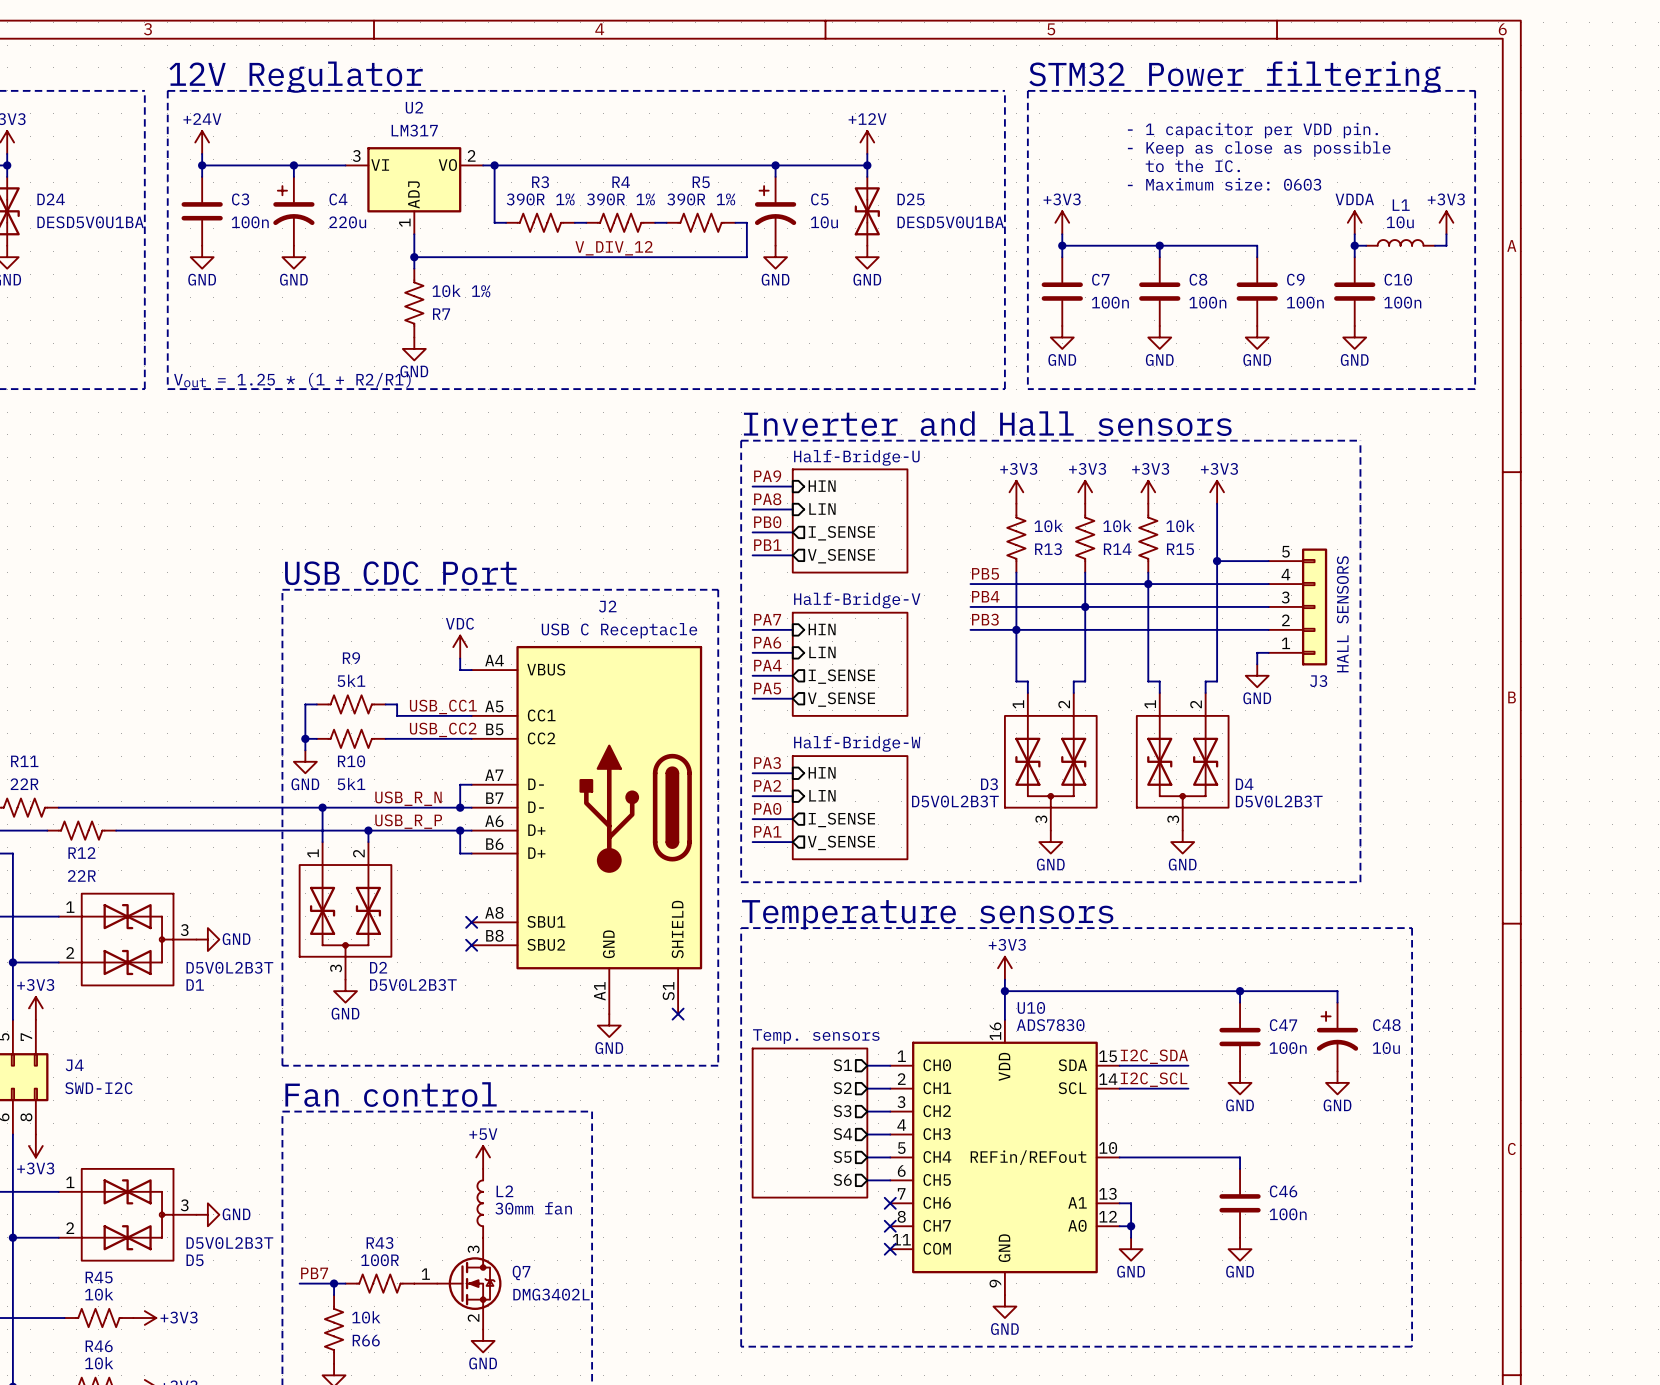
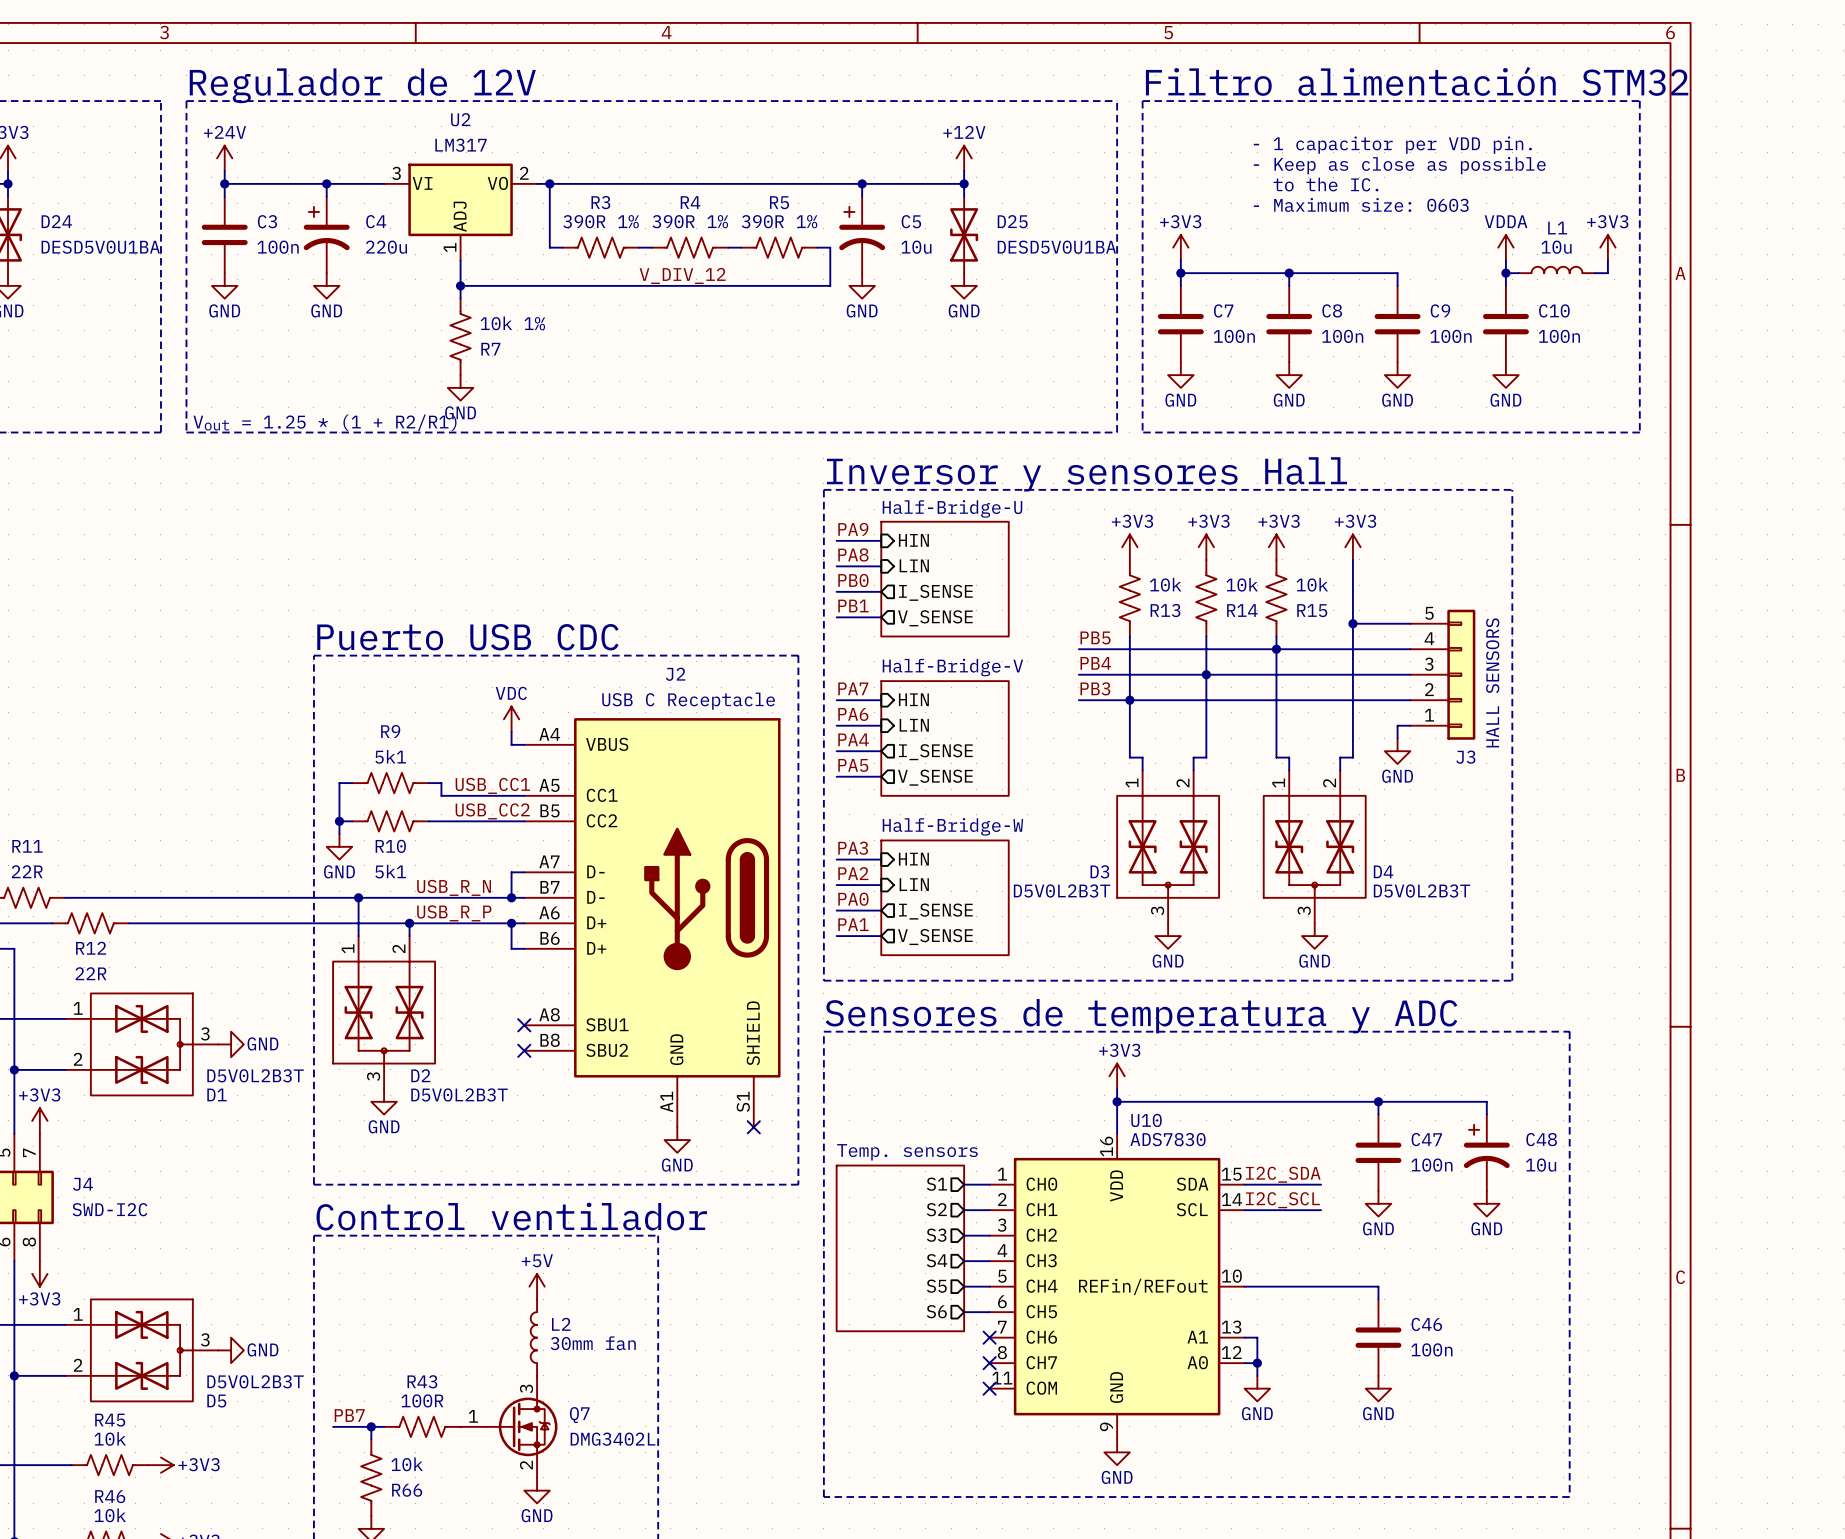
text: 12V Regulator (296, 77) -> Regulador de 12V (362, 85)
text: STM32 Power filtering (1235, 77) -> Filtro alimentación STM32 (1417, 81)
text: Inverter and Hall sensors (987, 423) -> Inversor y sensores Hall (1086, 474)
text: USB CDC Port (400, 573) -> Puerto USB CDC (467, 637)
text: Temperature sensors (927, 914) -> Sensores de temperatura y ADC (1141, 1016)
text: Fan control (391, 1094) -> Control ventilador (511, 1216)

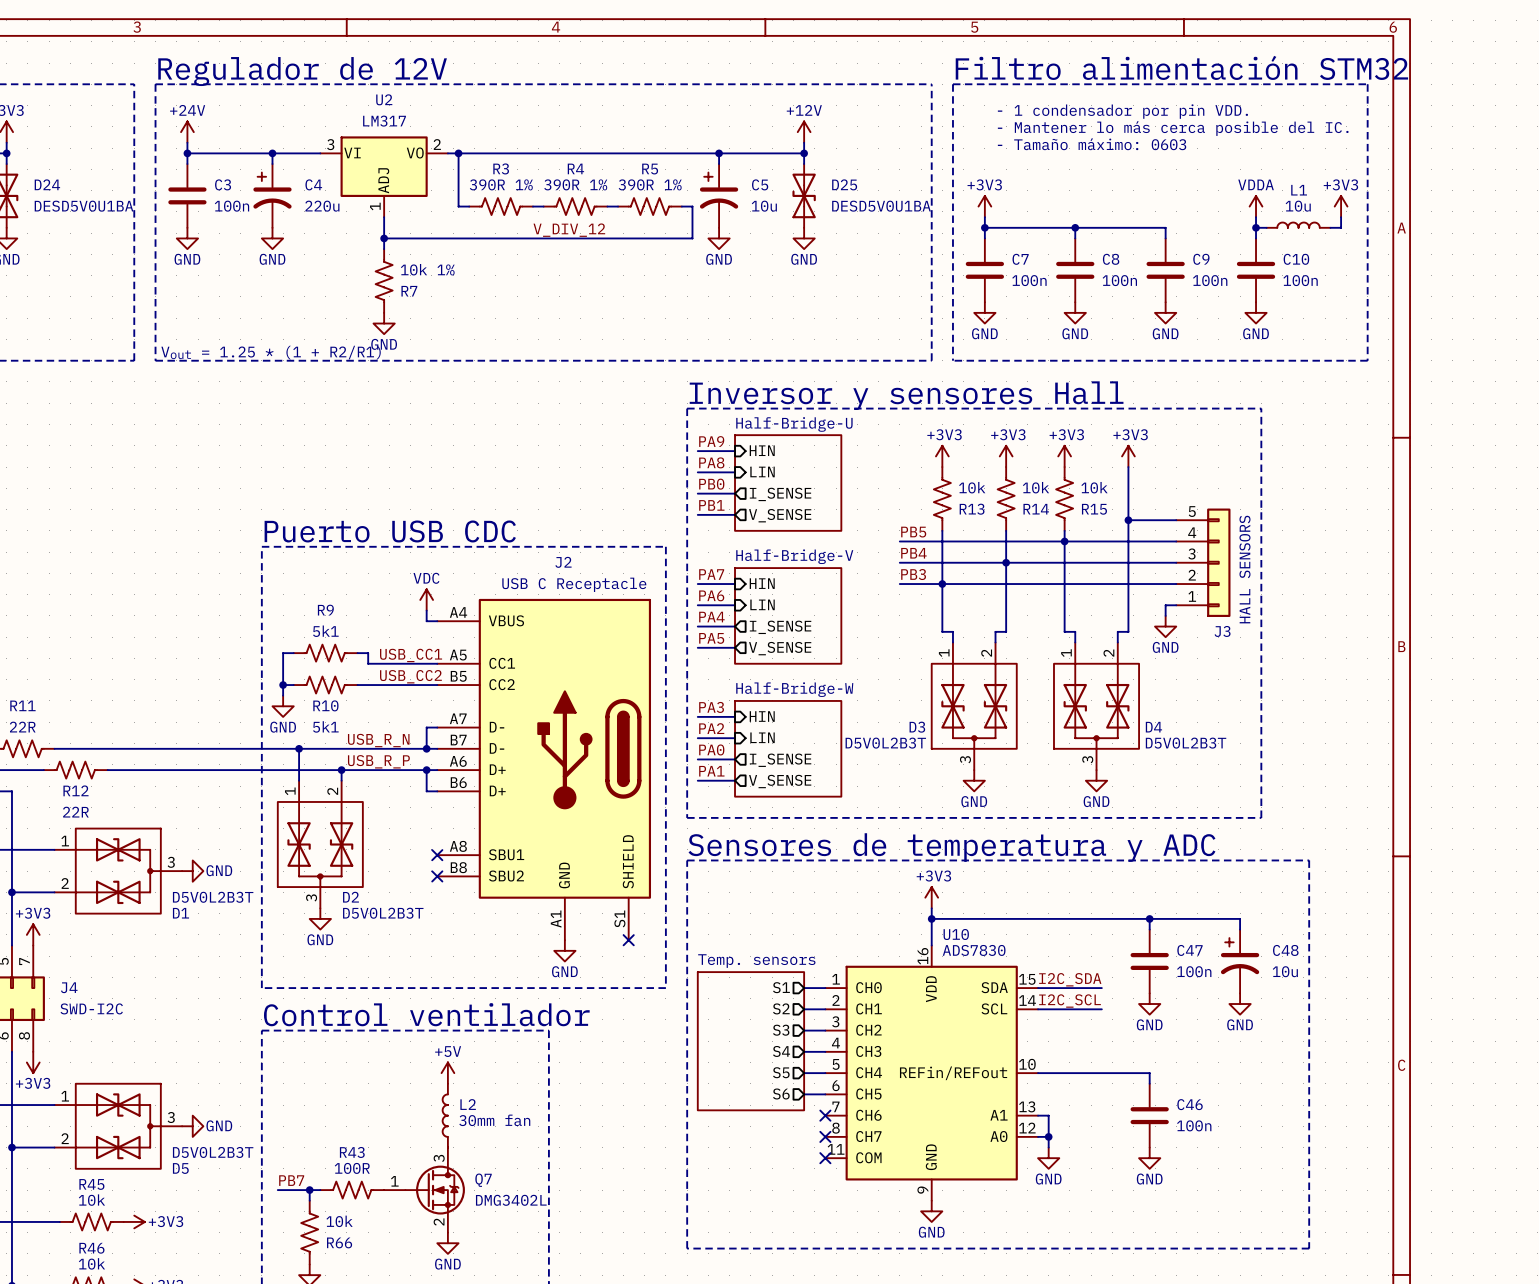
text: none -> - 1 condensador por pin VDD. (1122, 111)
text: - 1 capacitor per VDD pin. (1392, 145) -> none
text: none -> - Mantener lo más cerca posible del IC. (1173, 128)
text: - Keep as close as possible (1399, 165) -> none
text: none -> - Tamaño máximo: 0603 (1092, 144)
text: to the IC. (1325, 184) -> none
text: - Maximum size: 0603 (1361, 204) -> none

